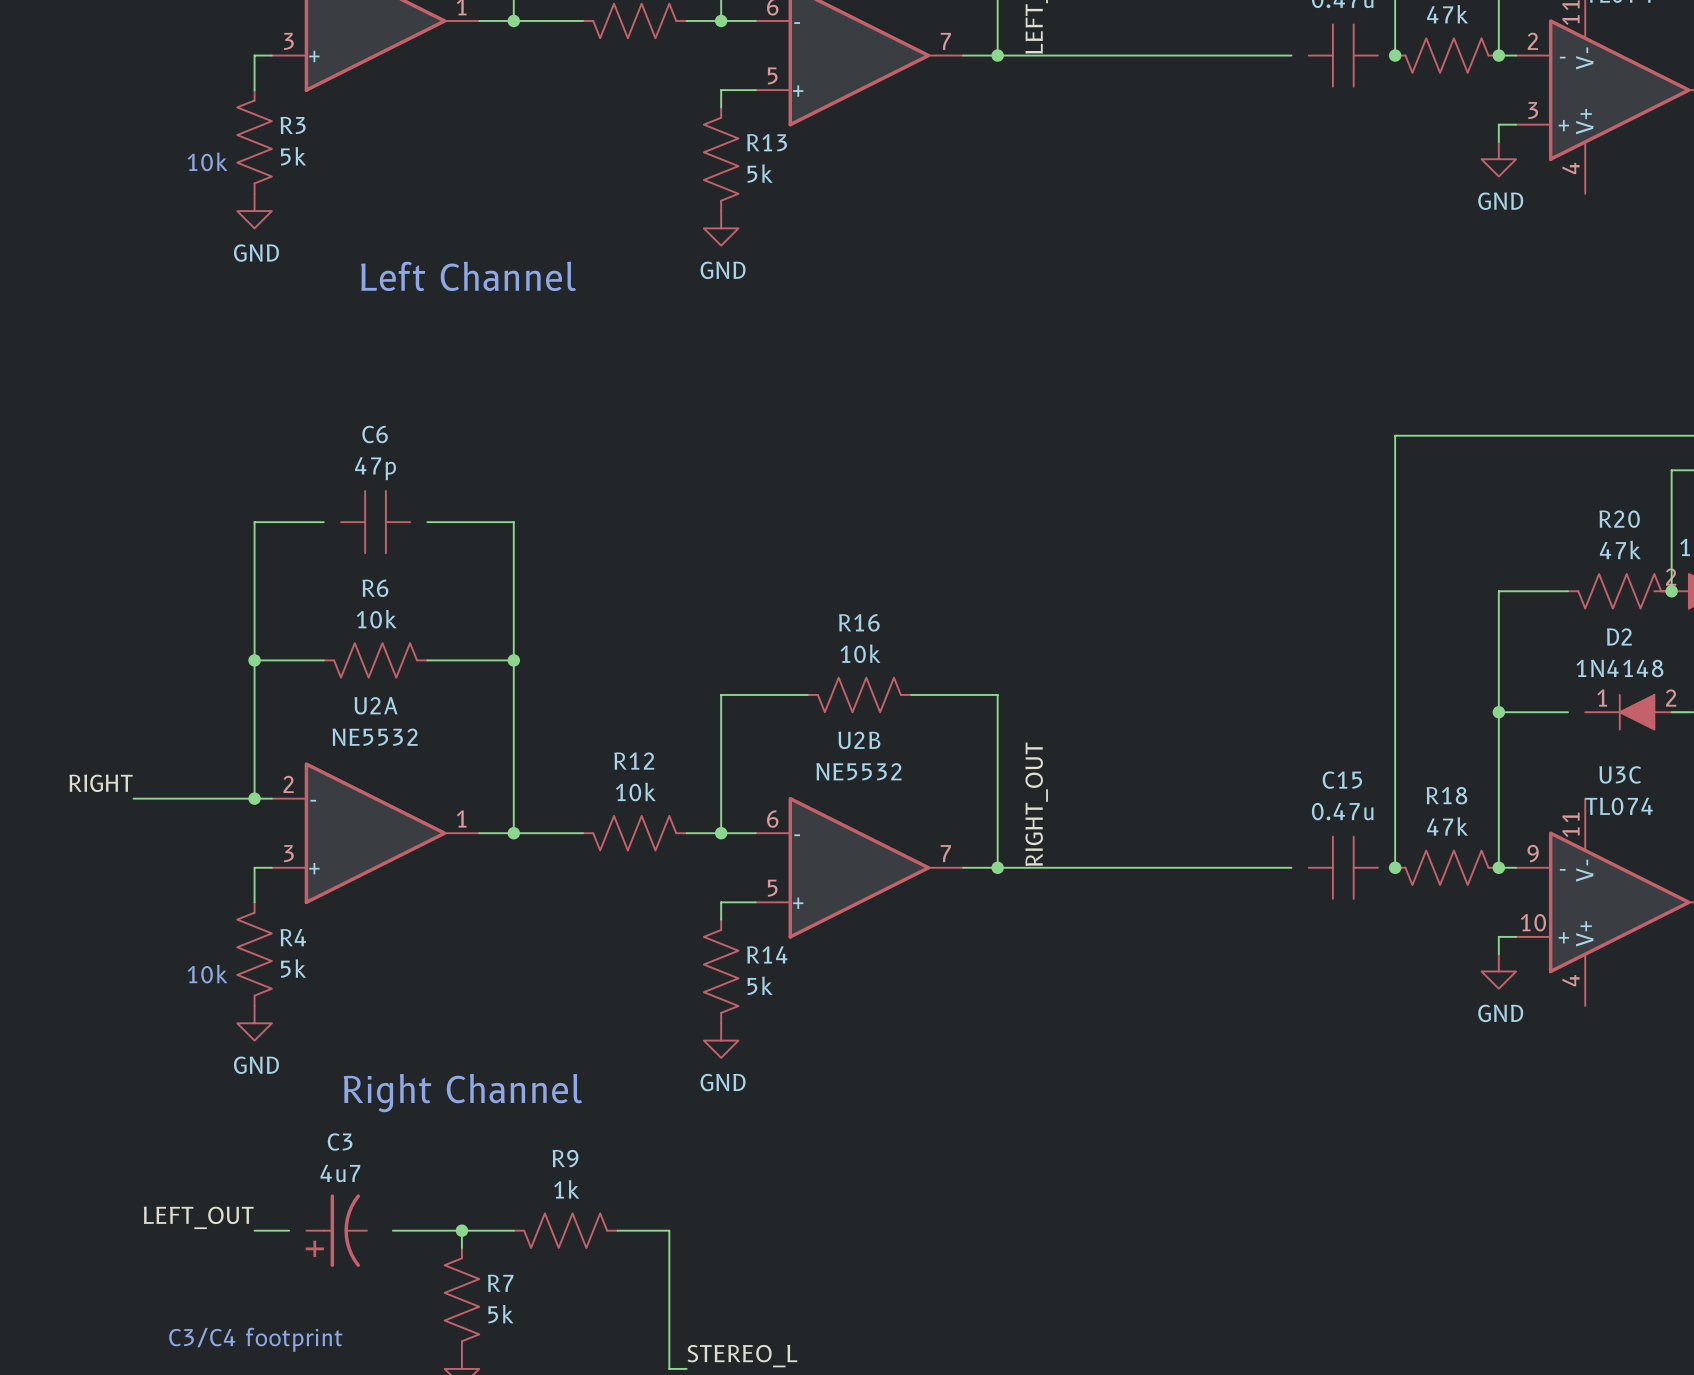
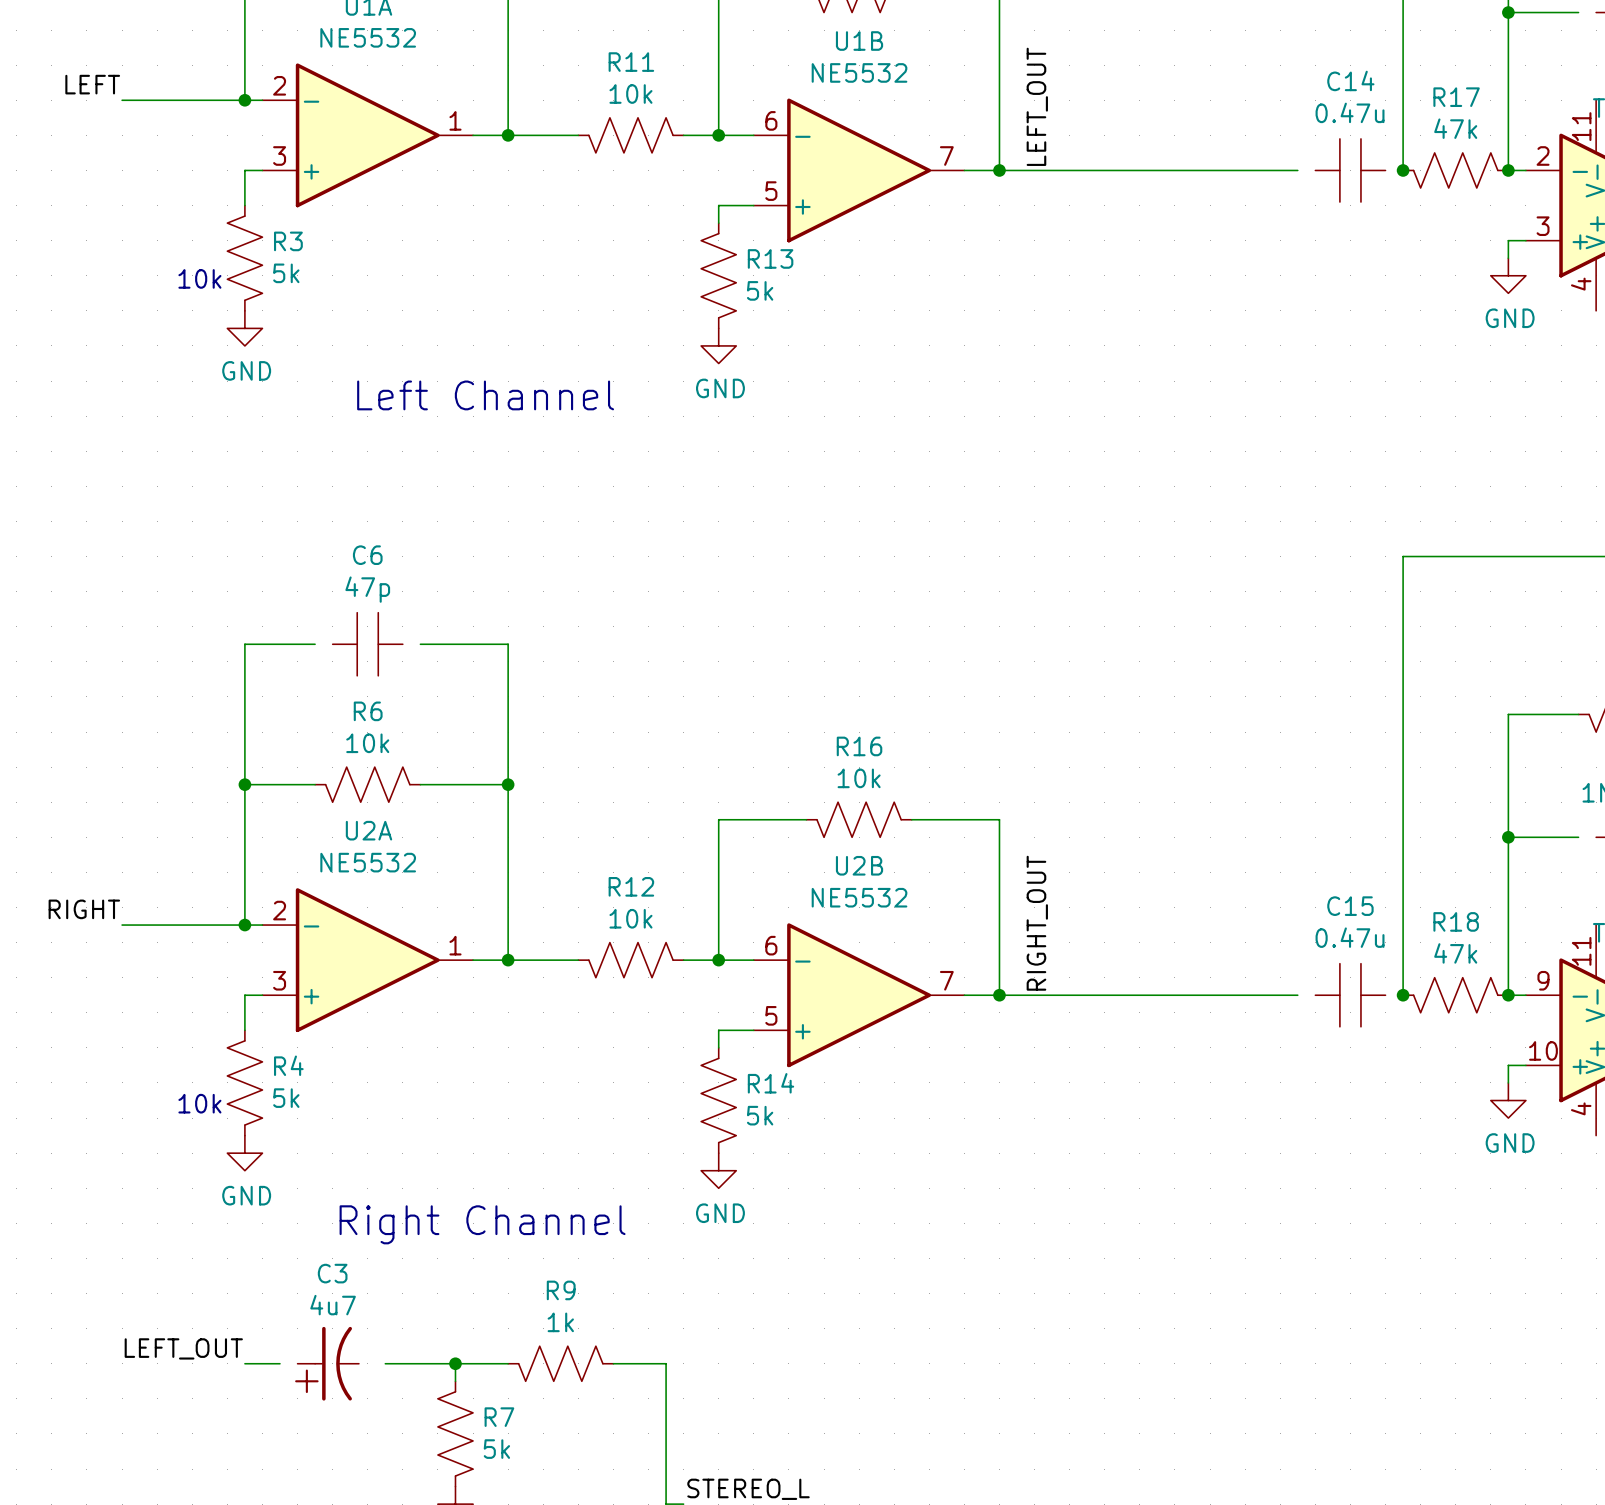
text: C3/C4 footprint (255, 1339) -> none

